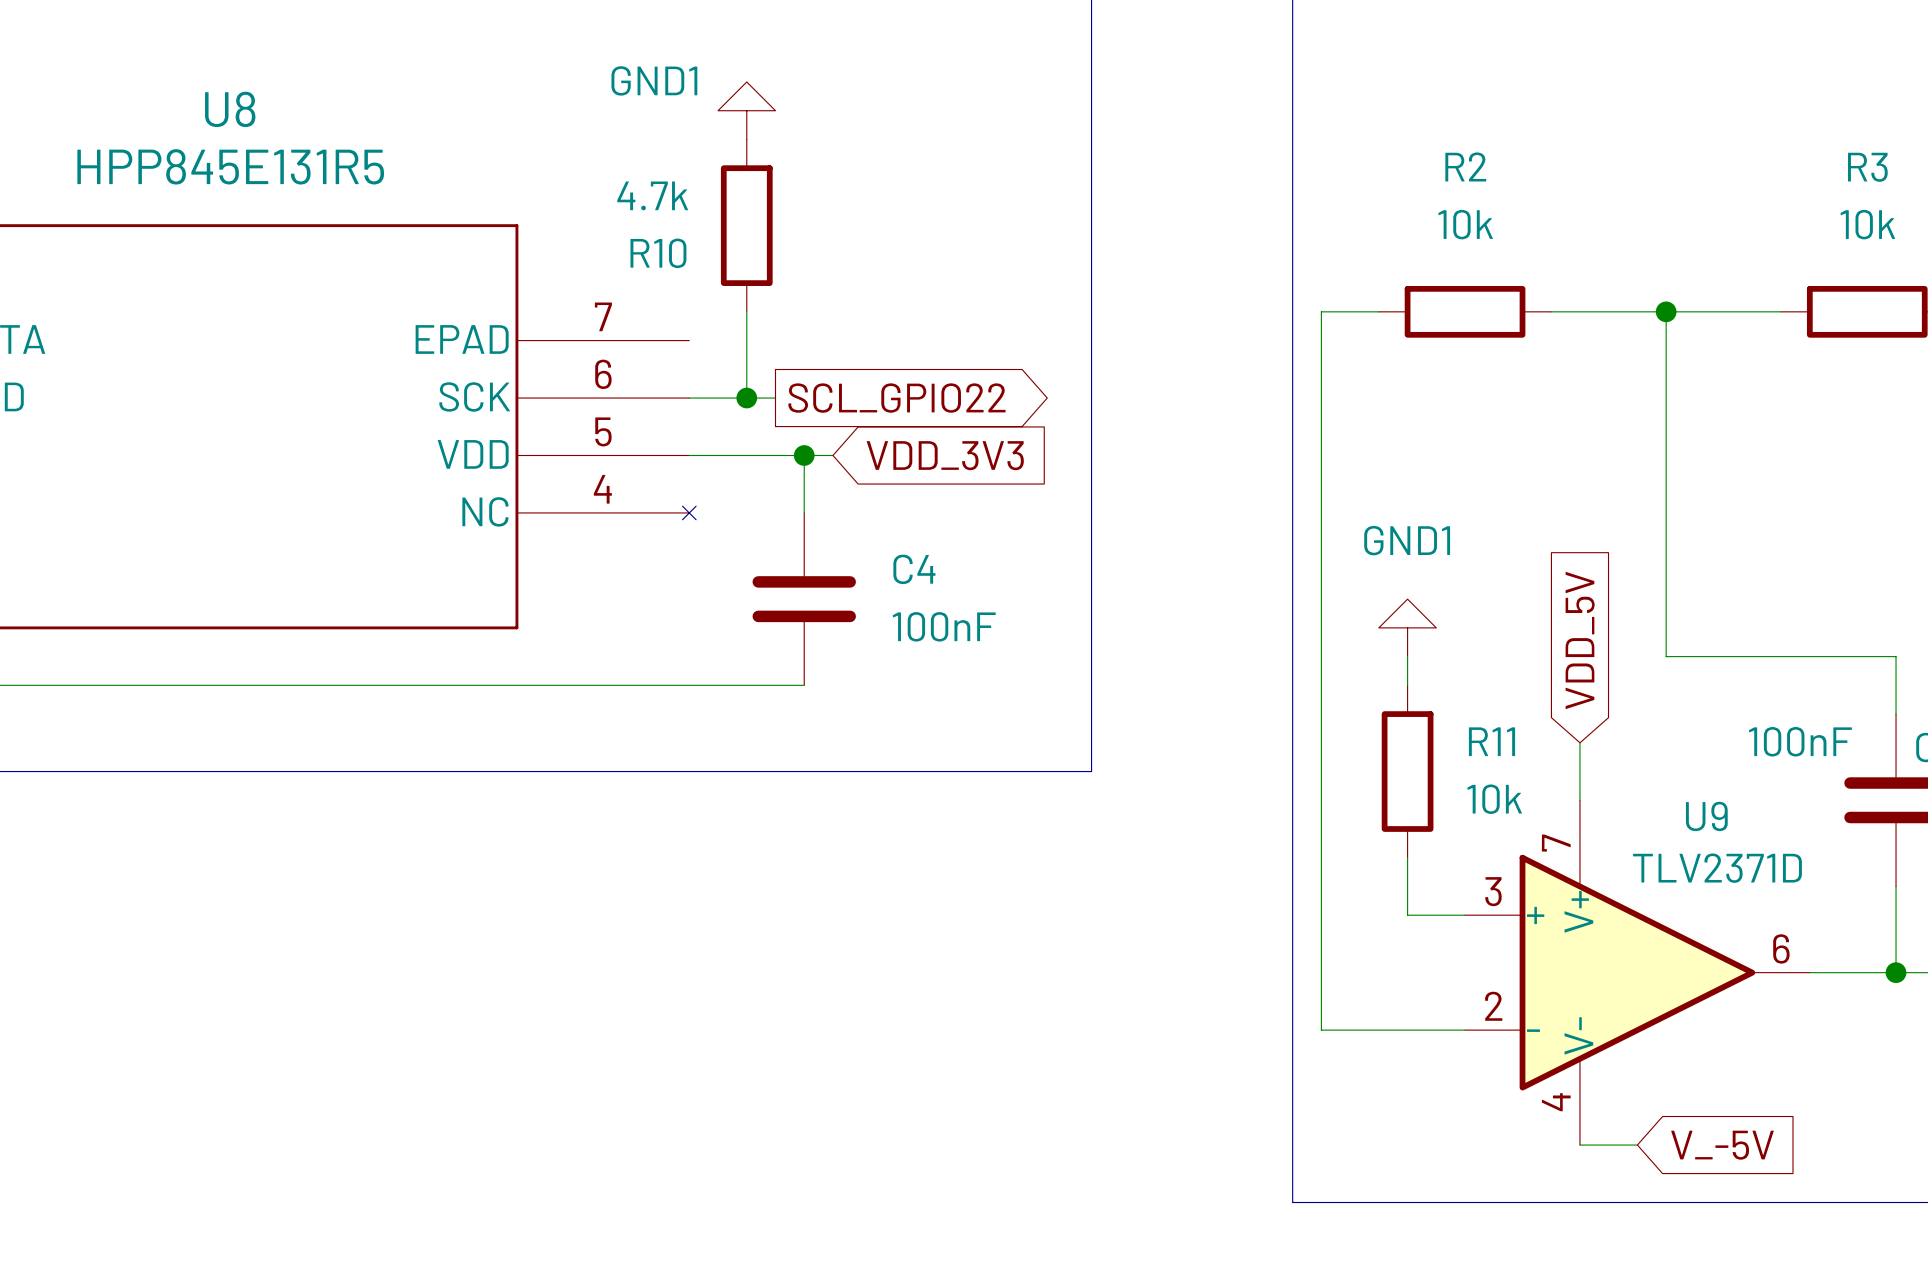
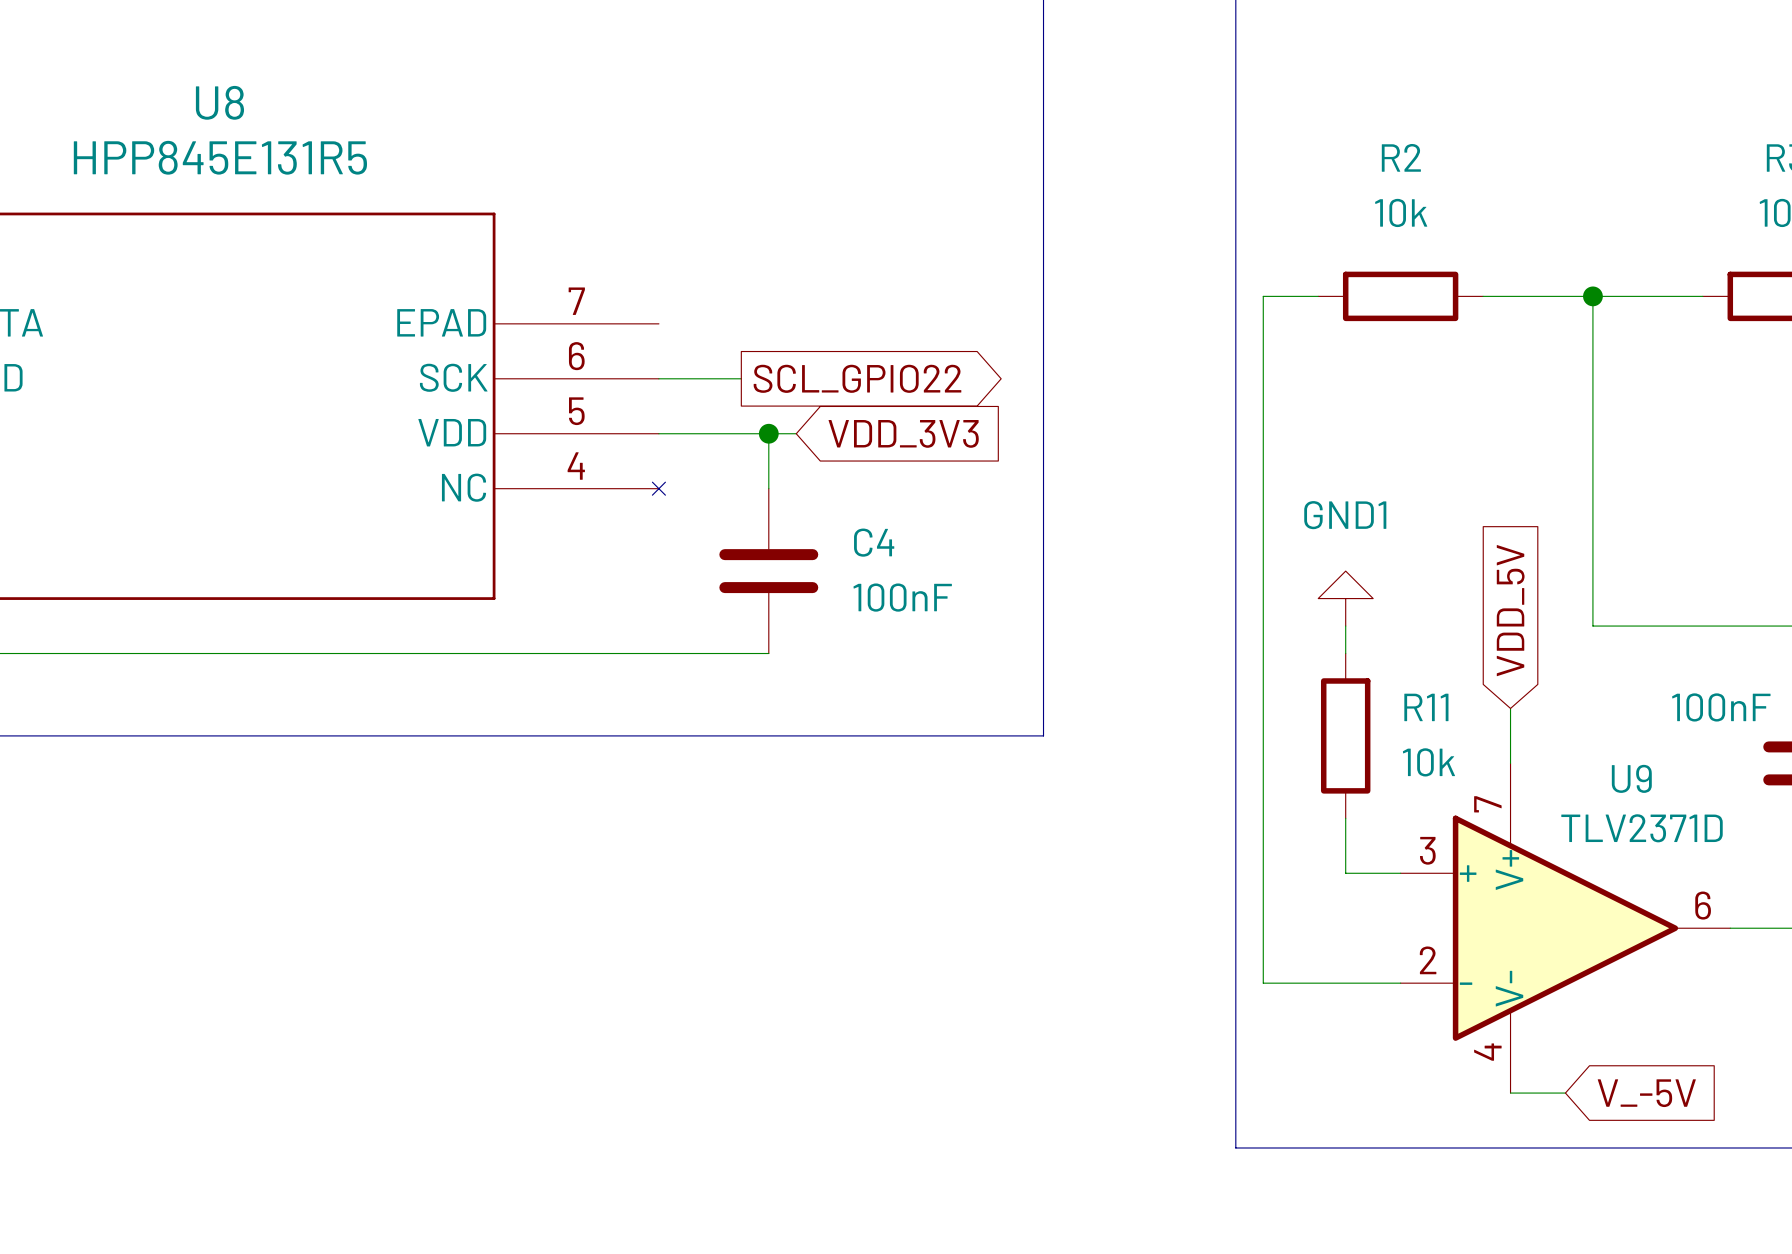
power symbol: GND1 (746, 110) -> none
R10: 4.7k (746, 225) -> none
wire: (746, 311) (746, 398) -> none
junction: (746, 398) -> none

